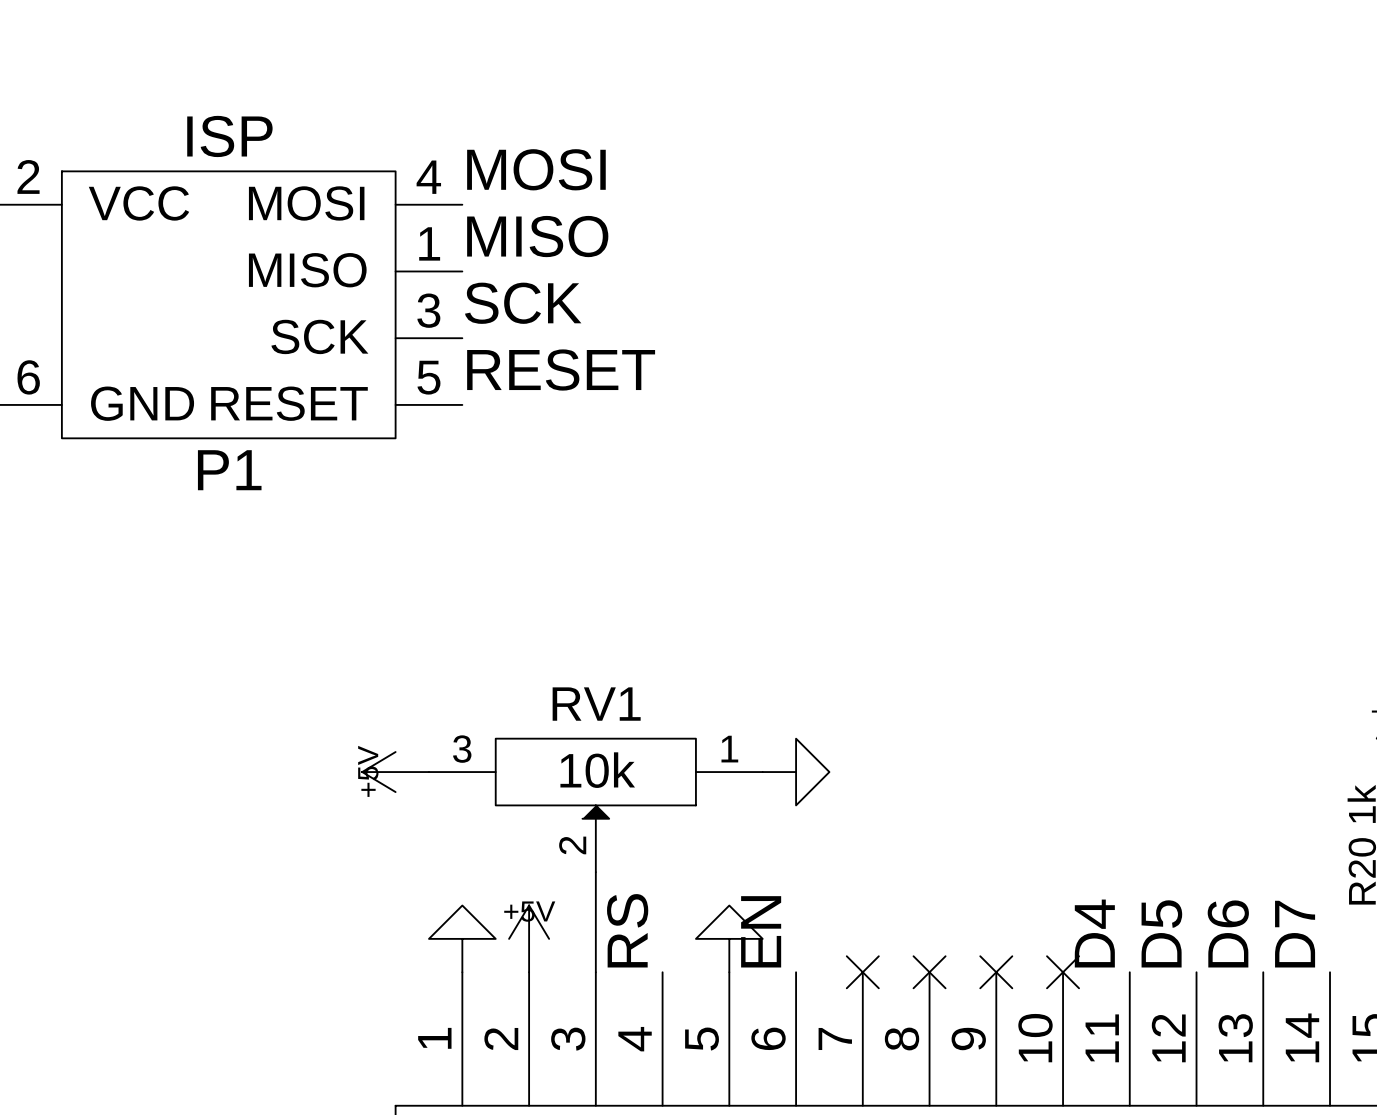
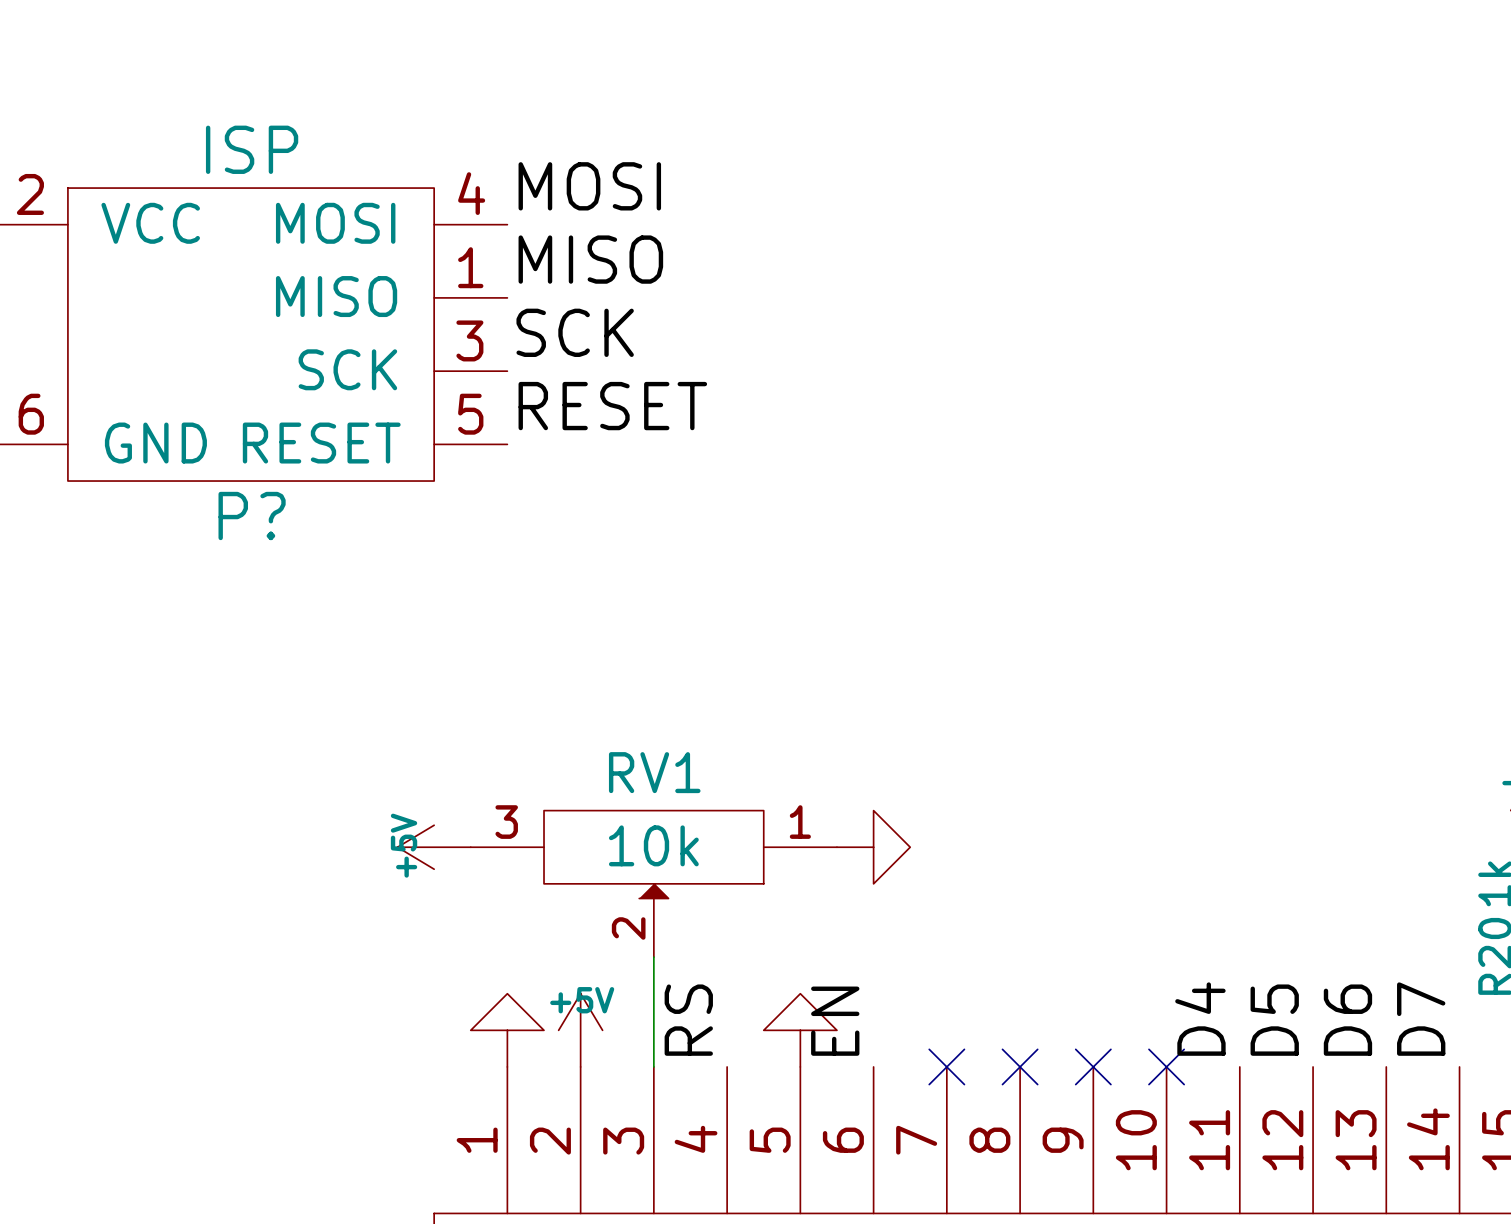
P1 name: P1 (229, 470) -> P? (252, 516)

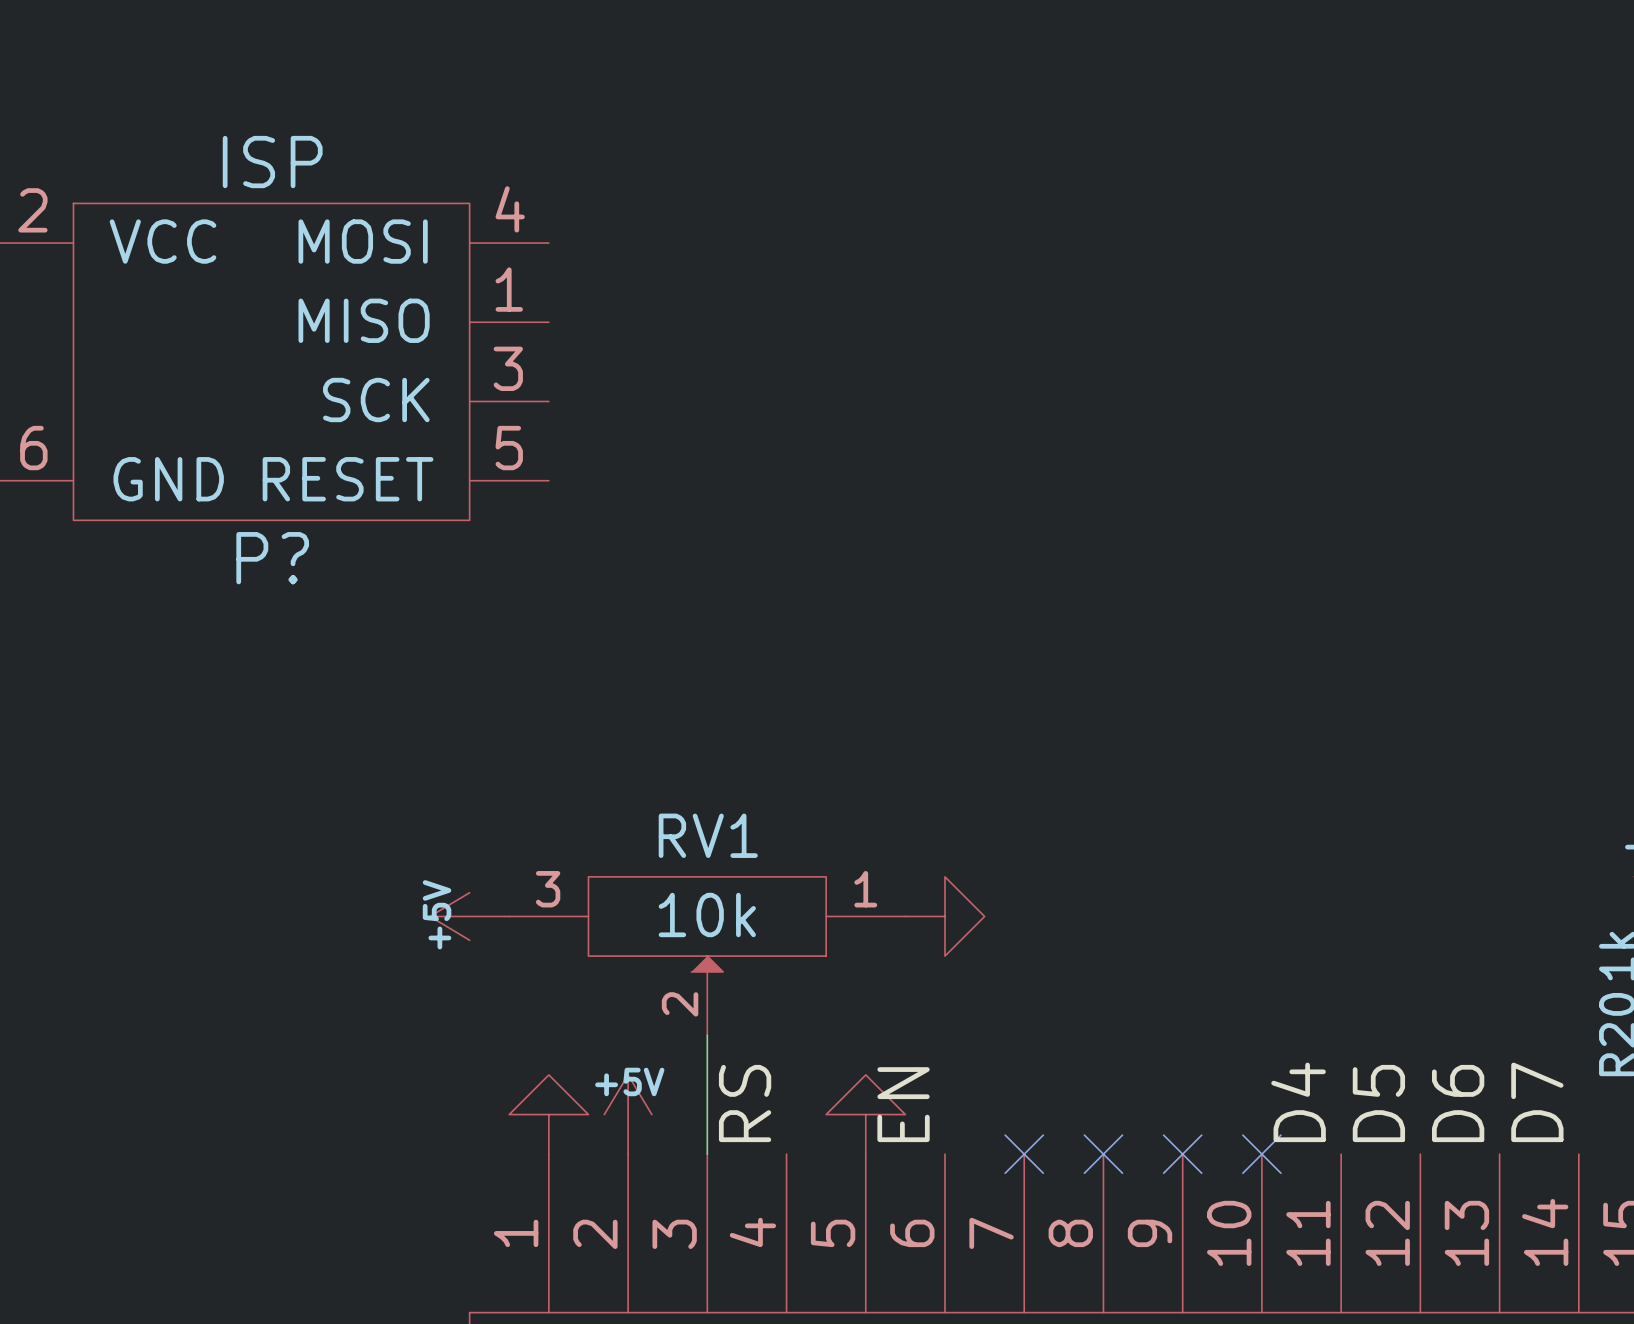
label: MOSI (589, 186) -> none
label: MISO (590, 259) -> none
label: SCK (575, 332) -> none
label: RESET (612, 406) -> none

